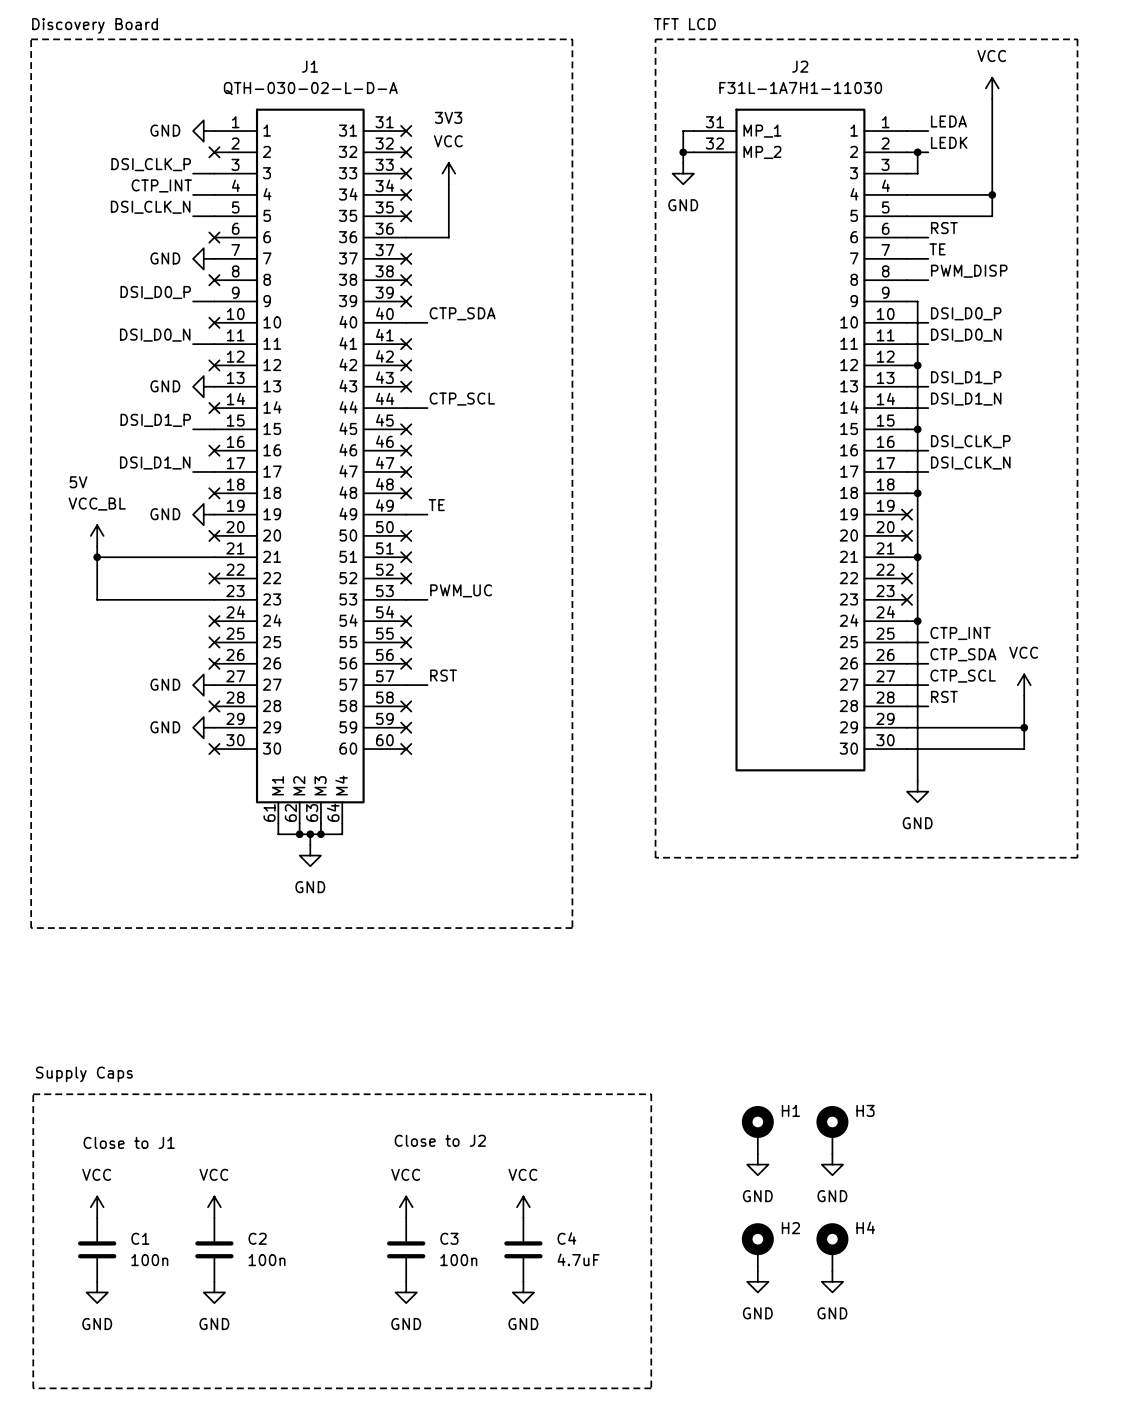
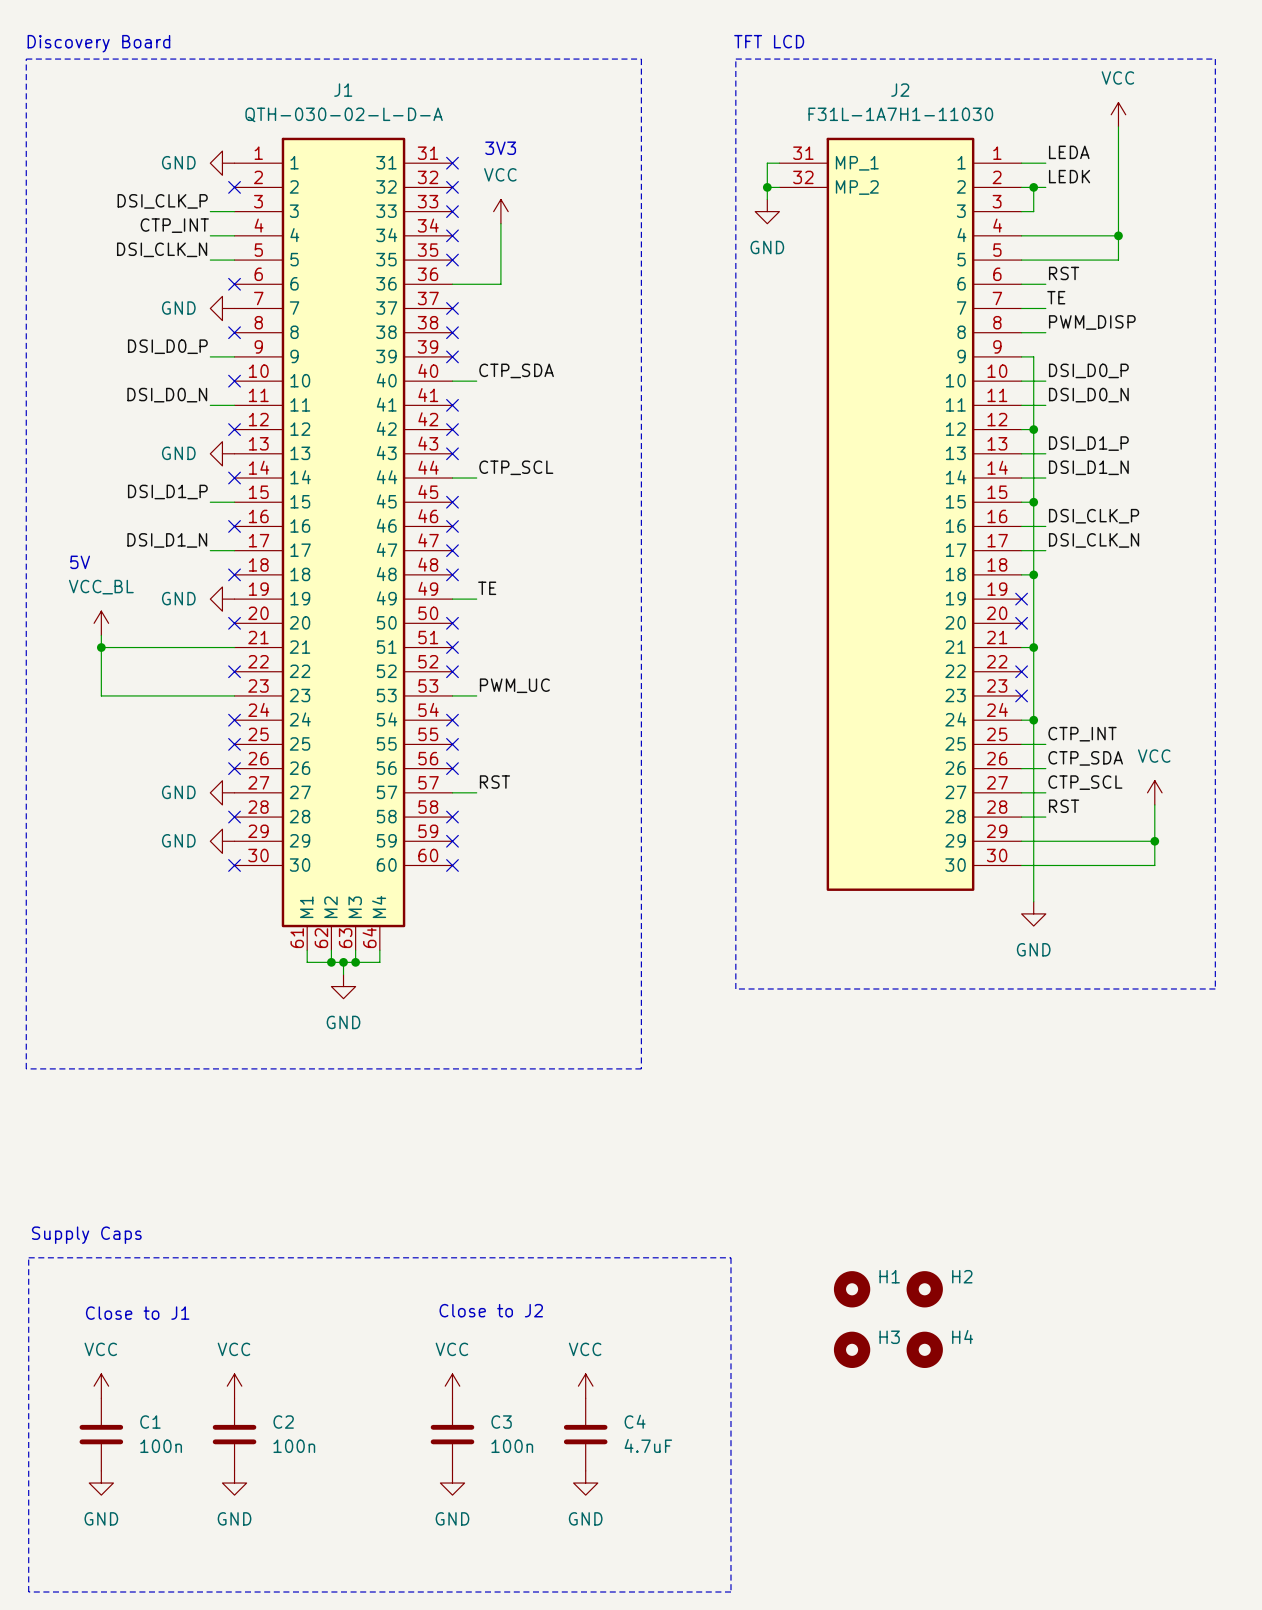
H1 symbol: [741, 1105, 774, 1154] -> [833, 1271, 871, 1308]
H3 symbol: [816, 1105, 849, 1154] -> [833, 1331, 871, 1368]
power symbol: GND (757, 1164) -> none
power symbol: GND (832, 1164) -> none
H2 symbol: [741, 1223, 774, 1272] -> [906, 1271, 943, 1308]
H4 symbol: [816, 1223, 849, 1272] -> [906, 1331, 943, 1368]
power symbol: GND (757, 1281) -> none
power symbol: GND (832, 1281) -> none

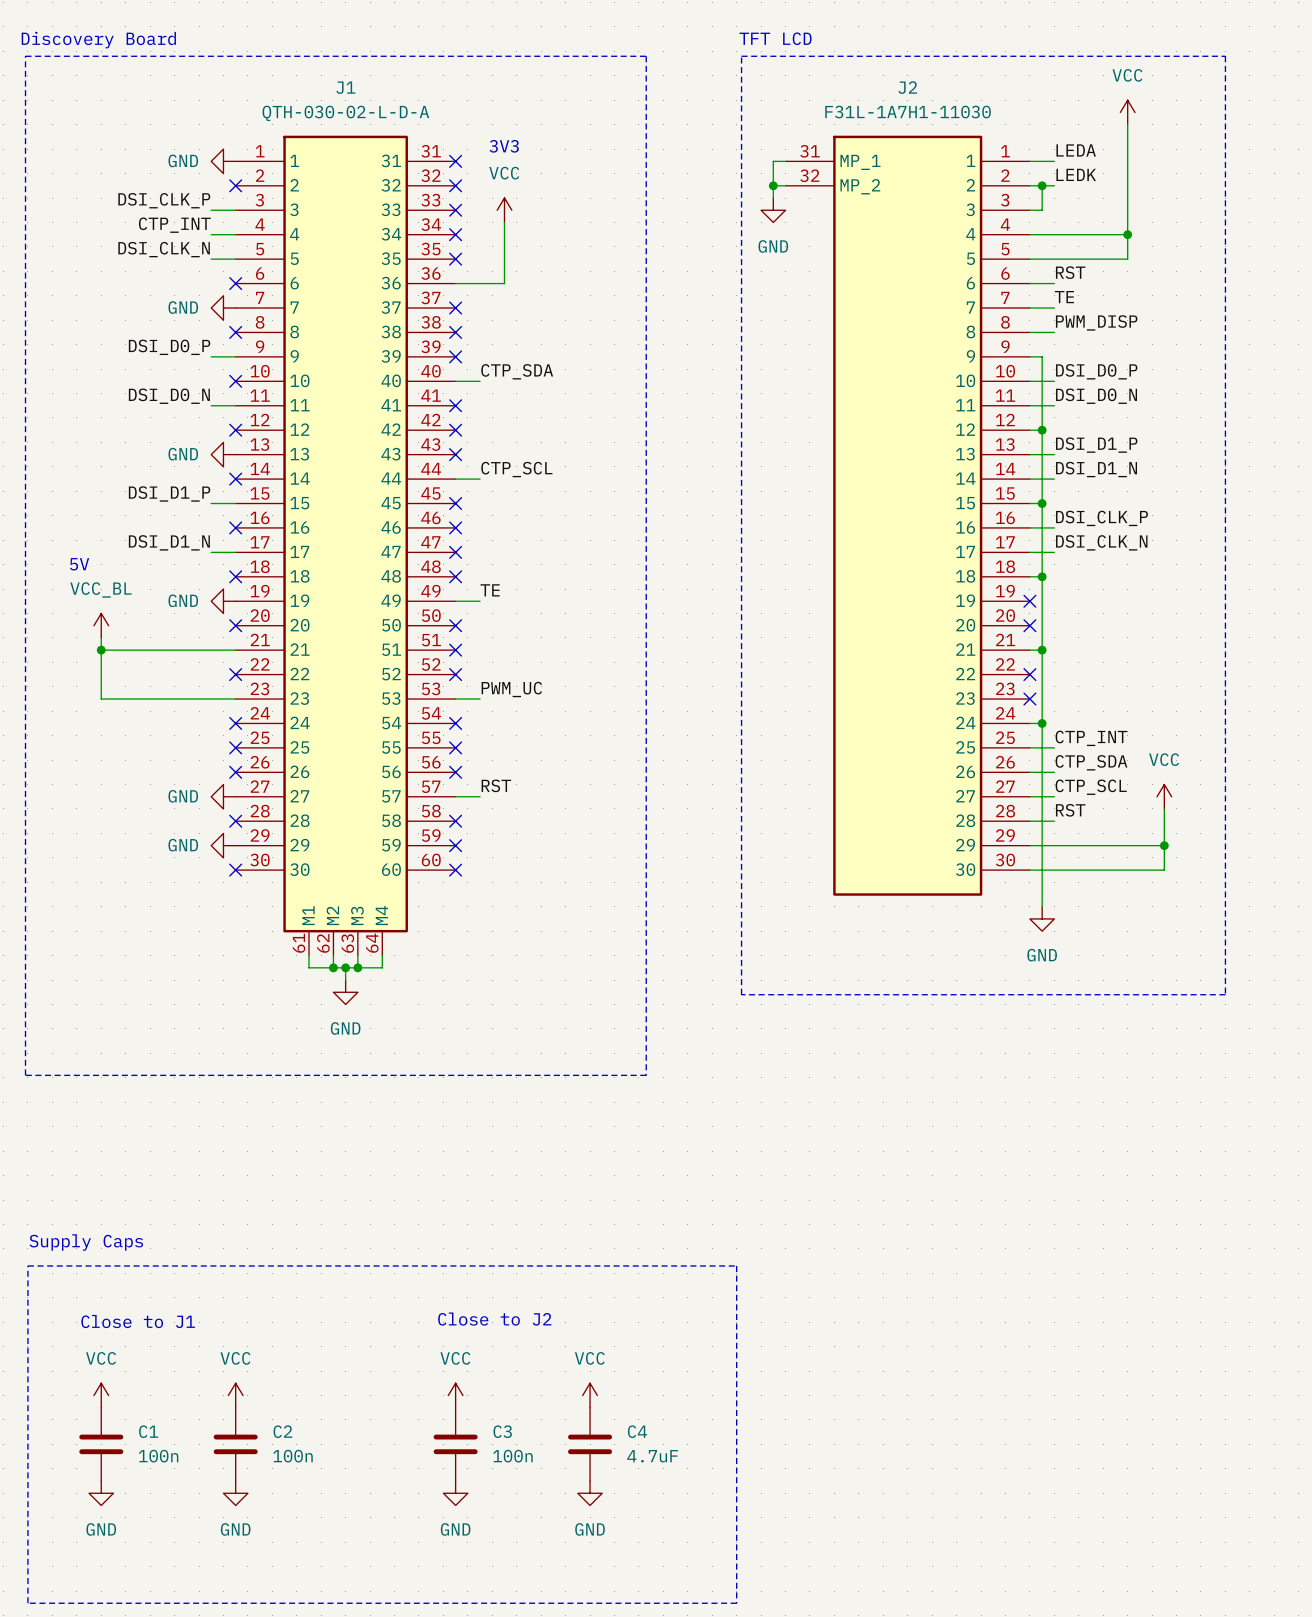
H1: (852, 1289) -> none
H2: (924, 1289) -> none
H3: (852, 1349) -> none
H4: (924, 1349) -> none

